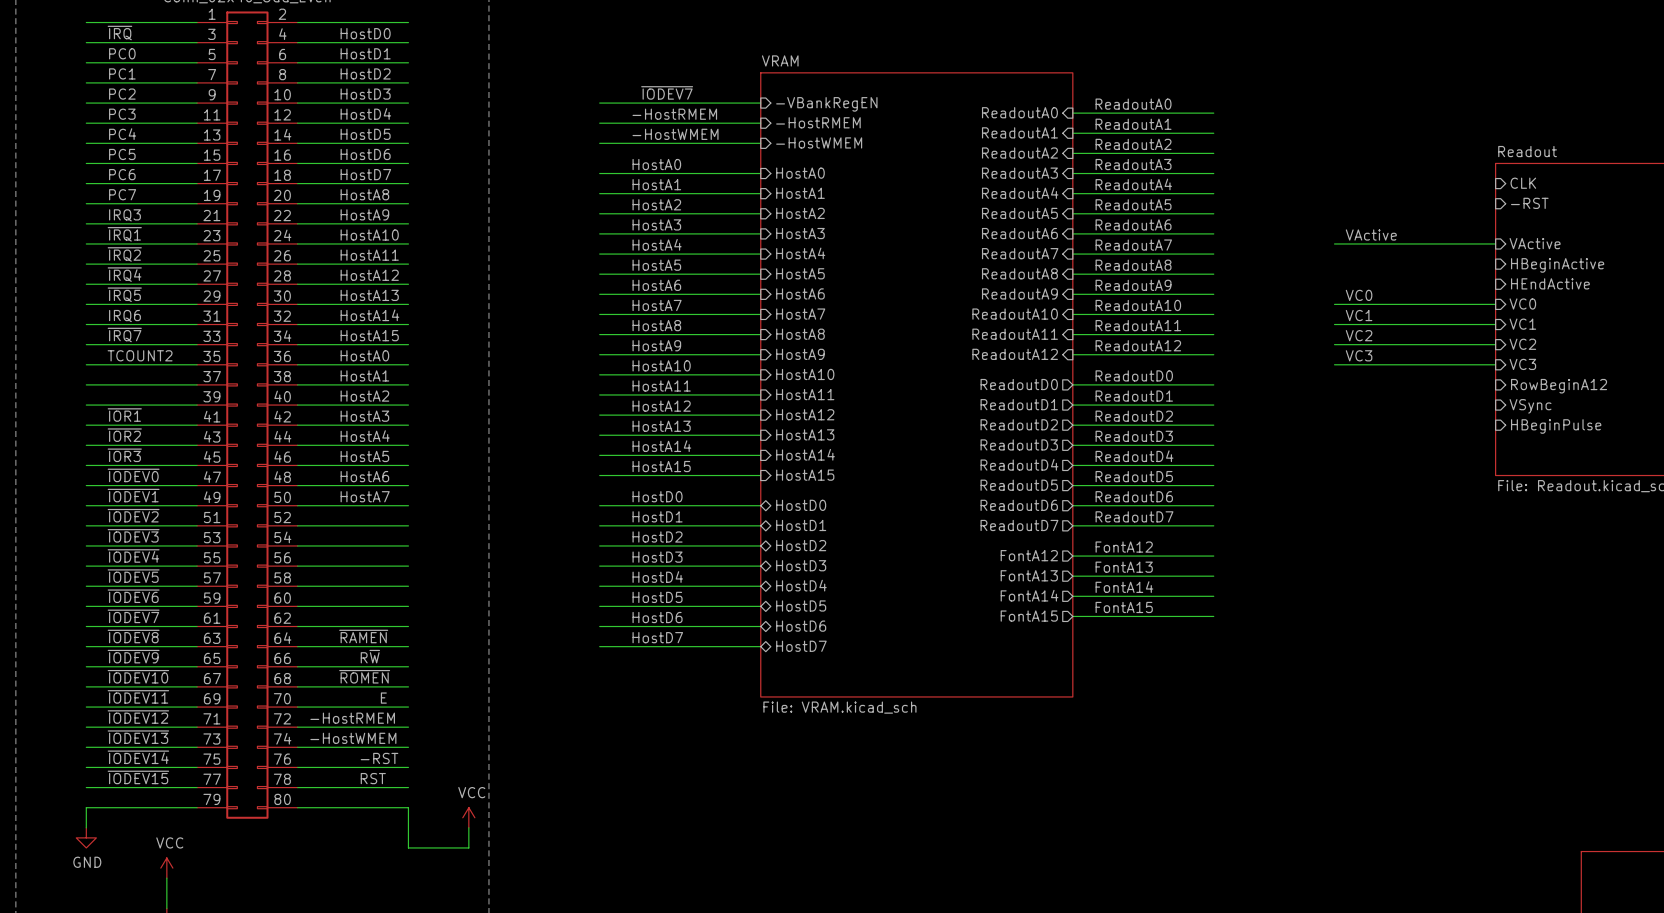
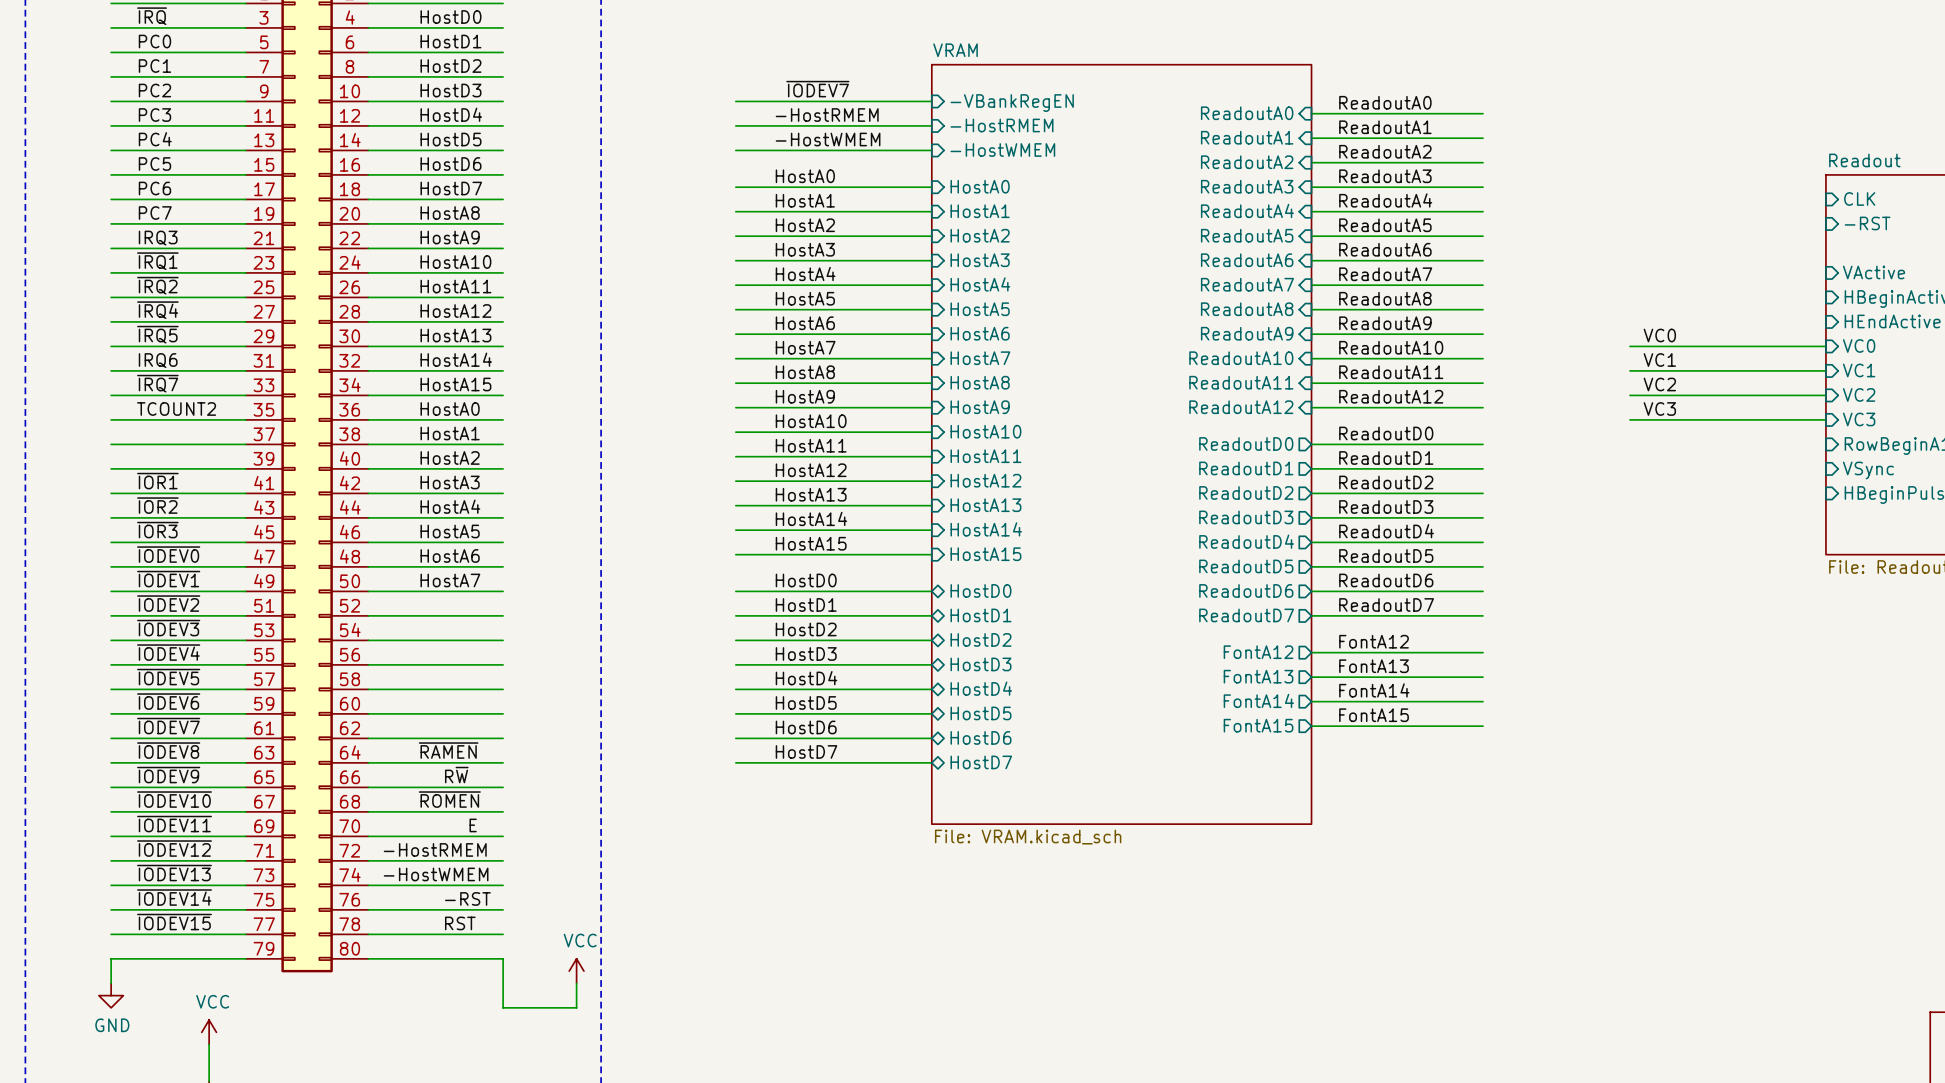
label: VActive (1371, 235) -> none
wire: (1334, 243) (1495, 243) -> none

